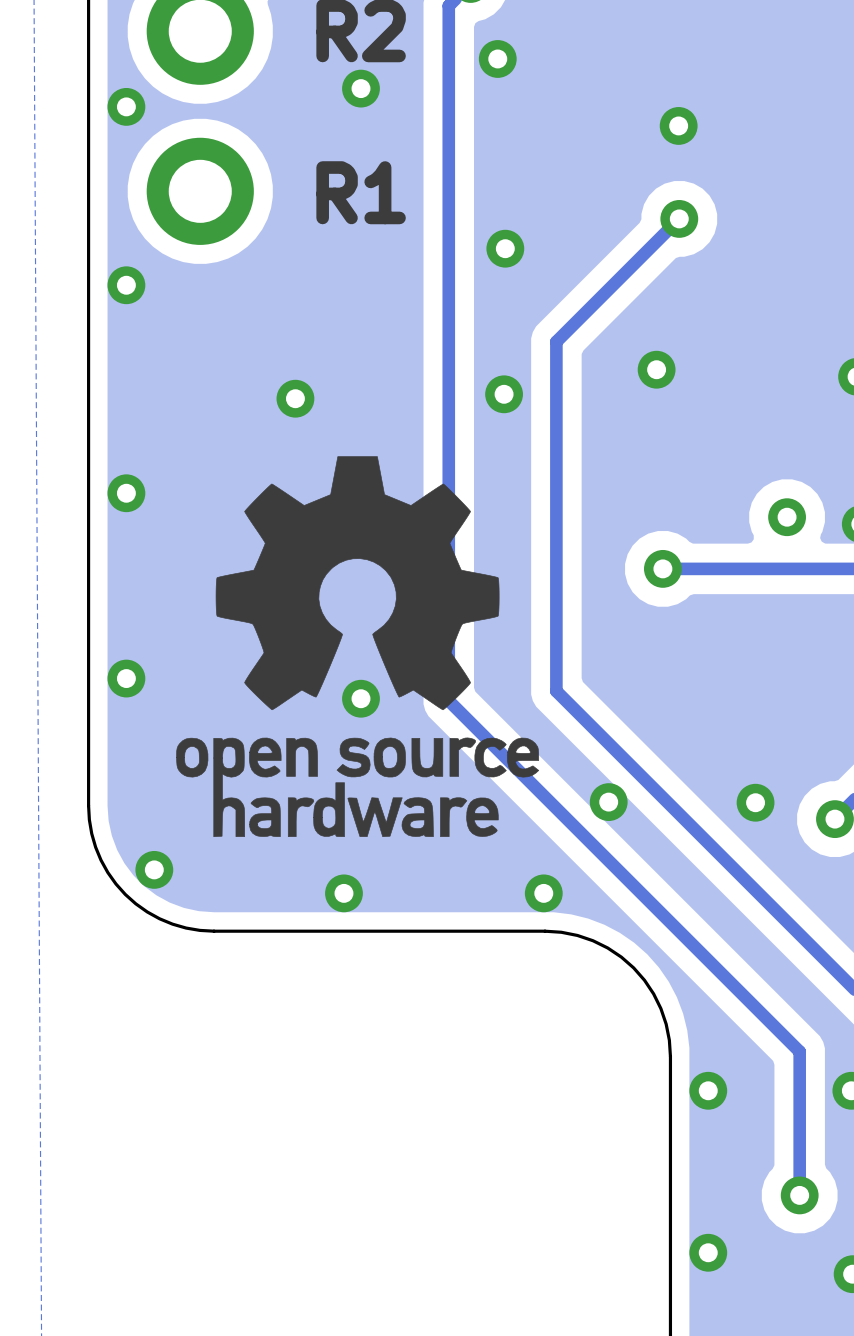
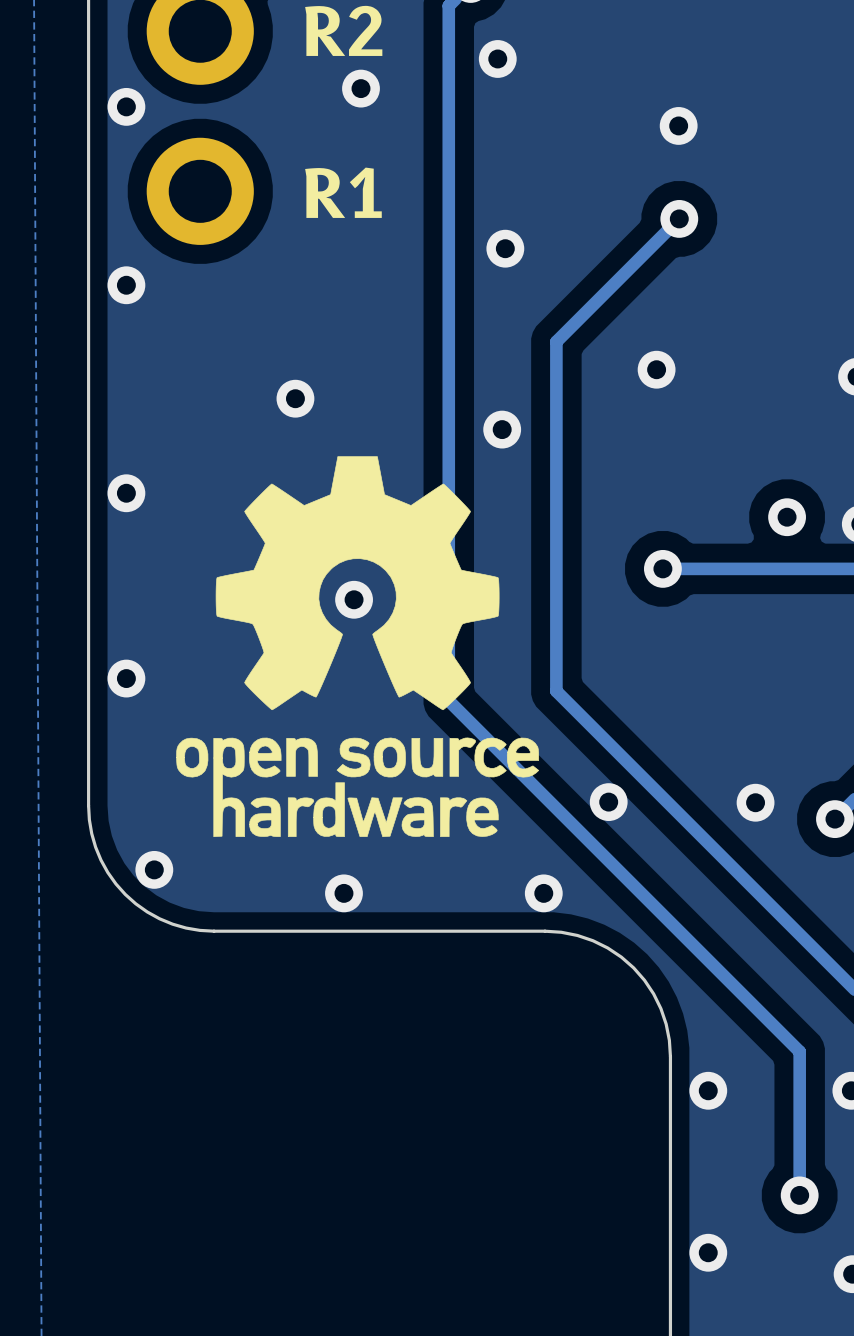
via position: (504, 394) -> (502, 429)
via position: (360, 698) -> (354, 599)

